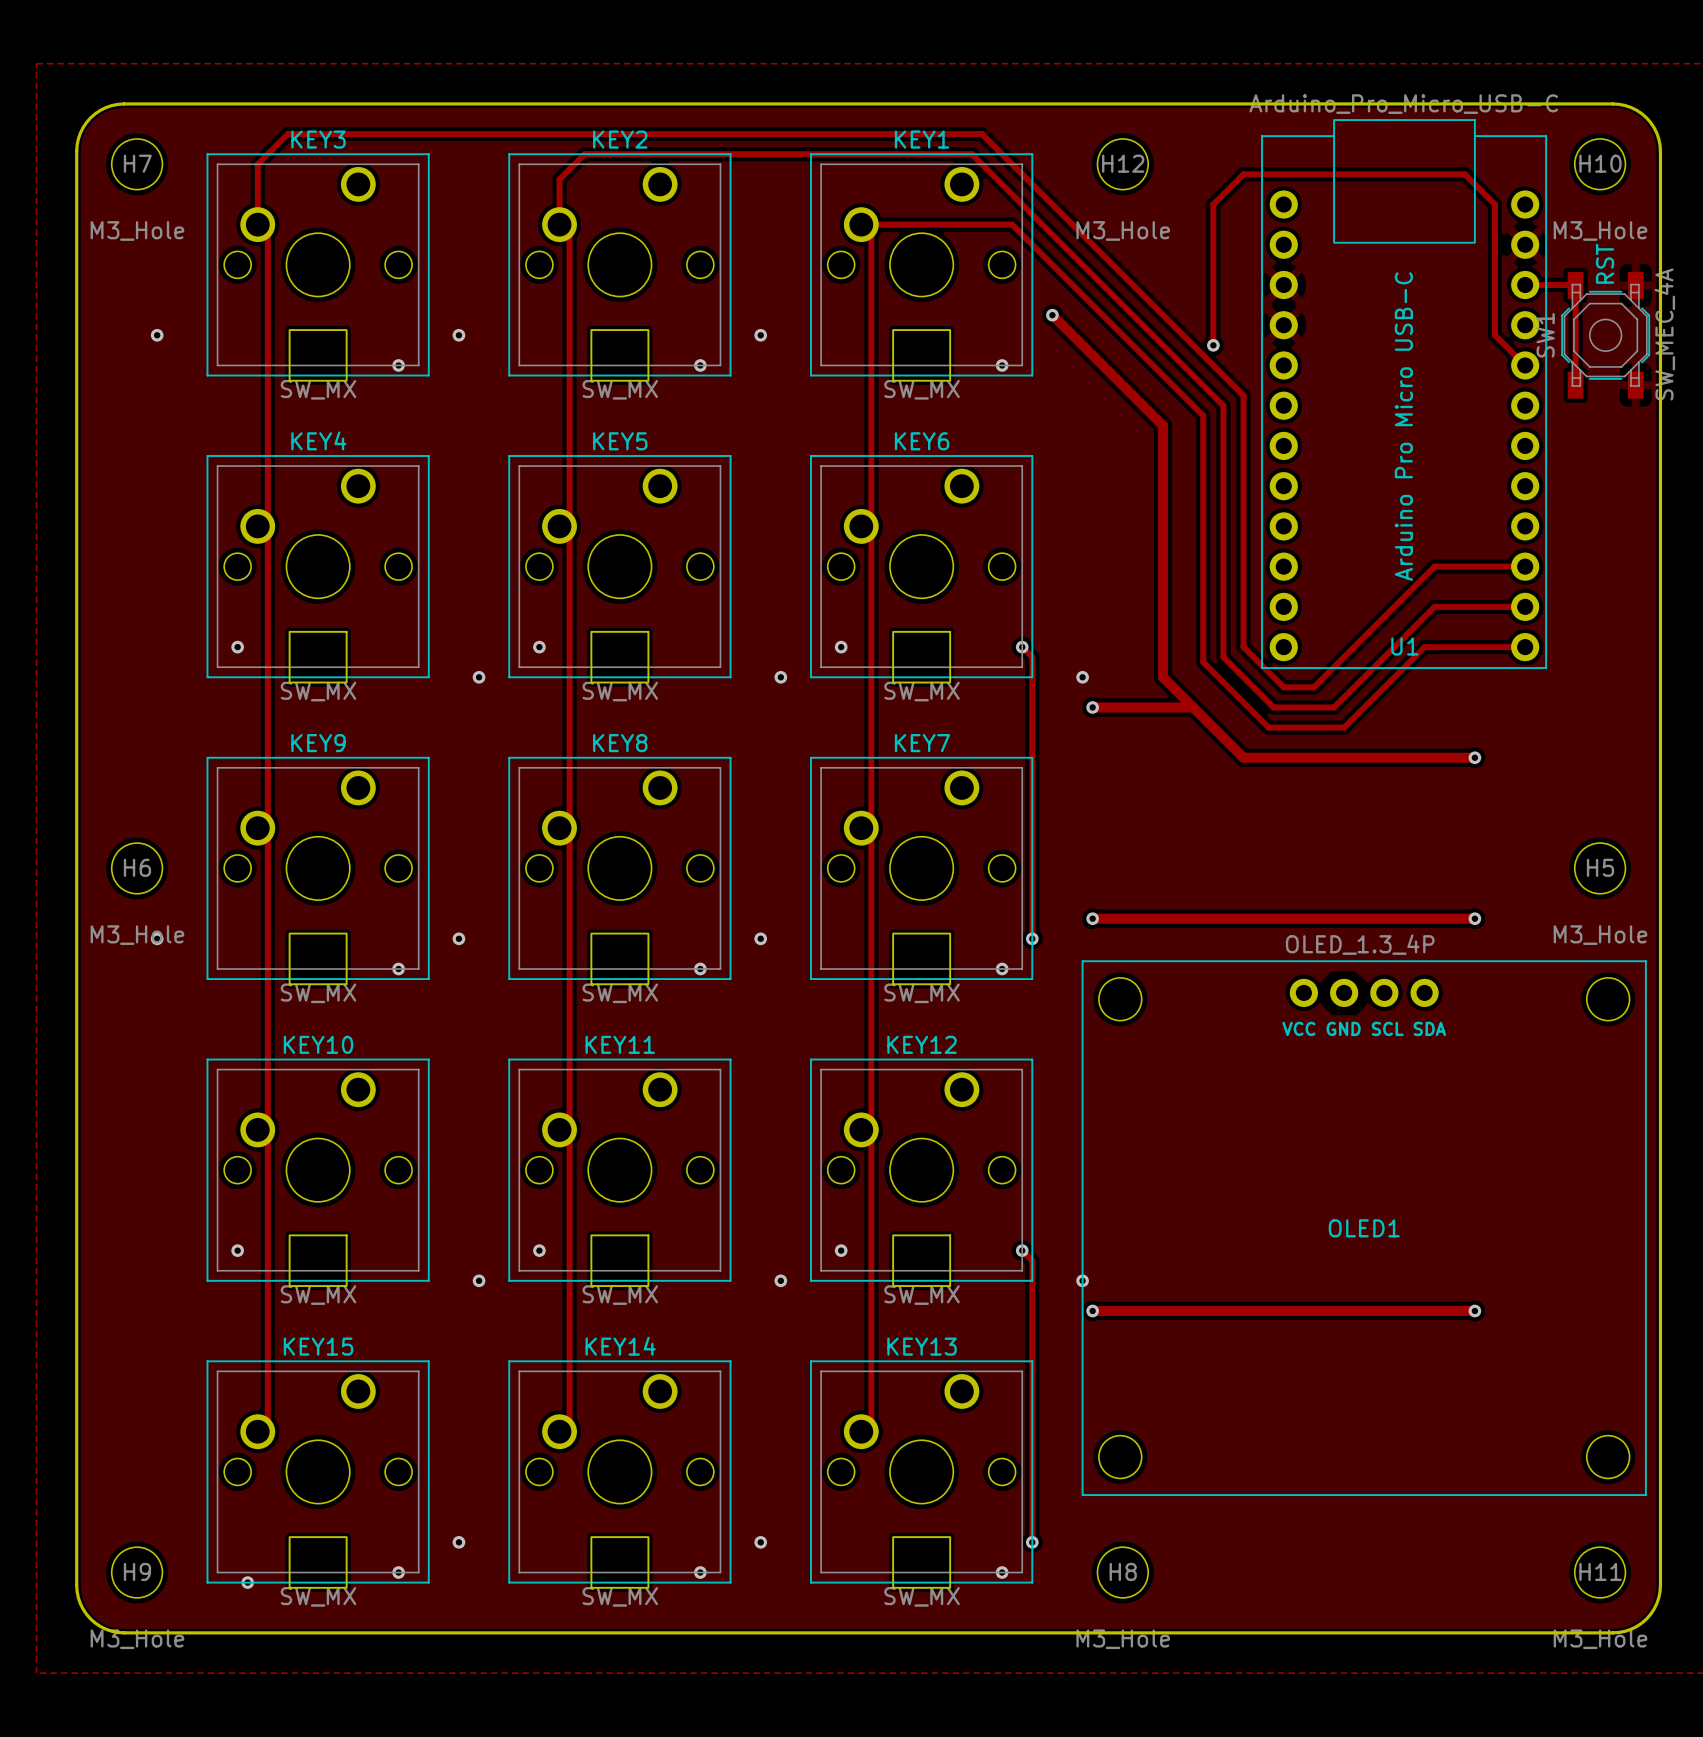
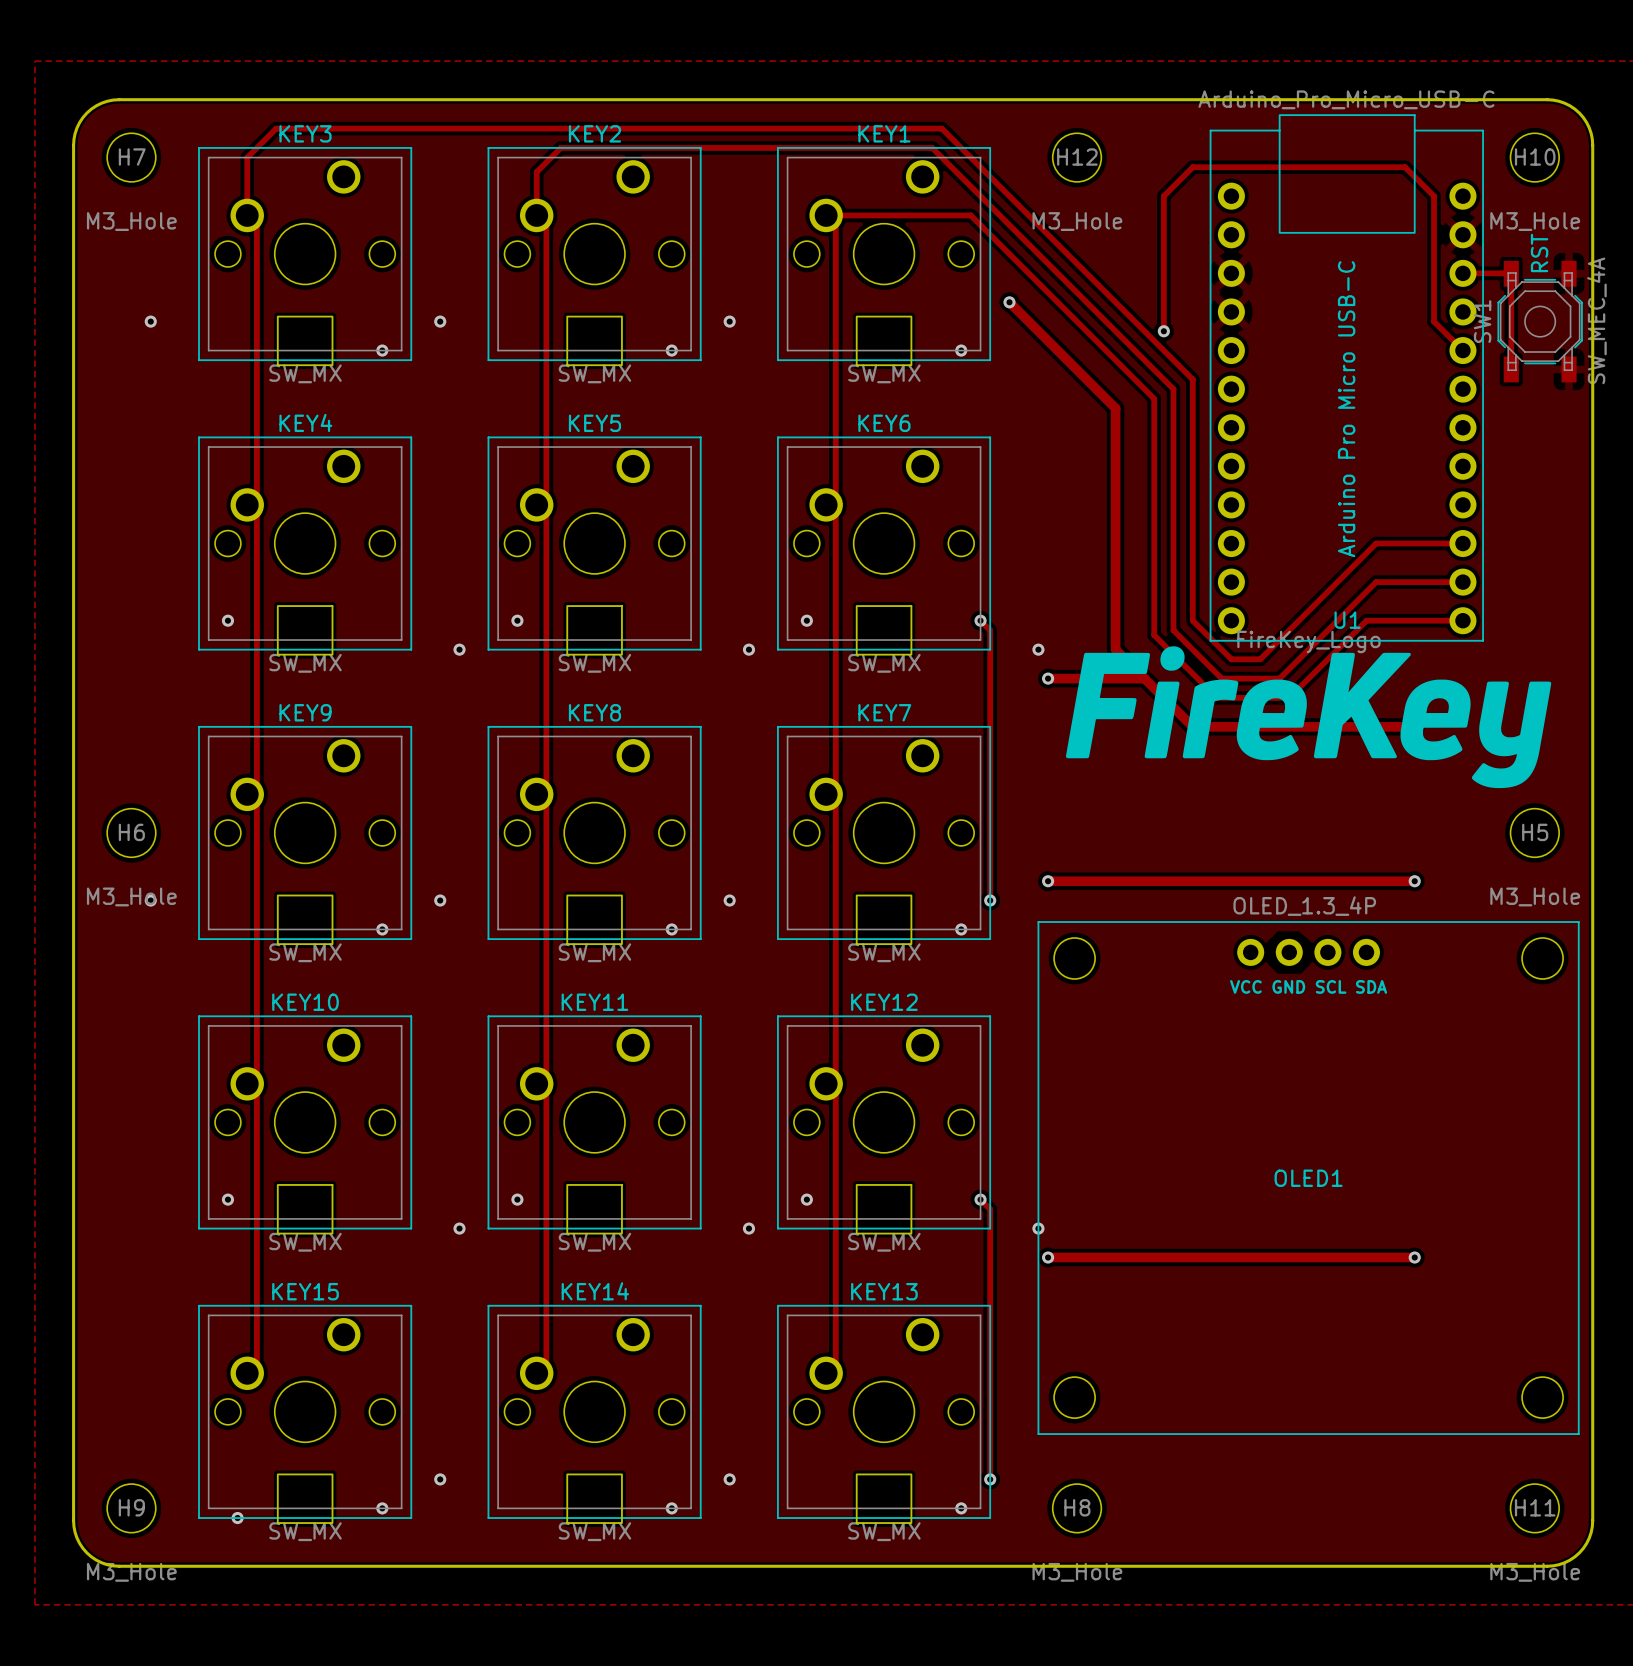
drawing: none -> [1065, 646, 1552, 789]

